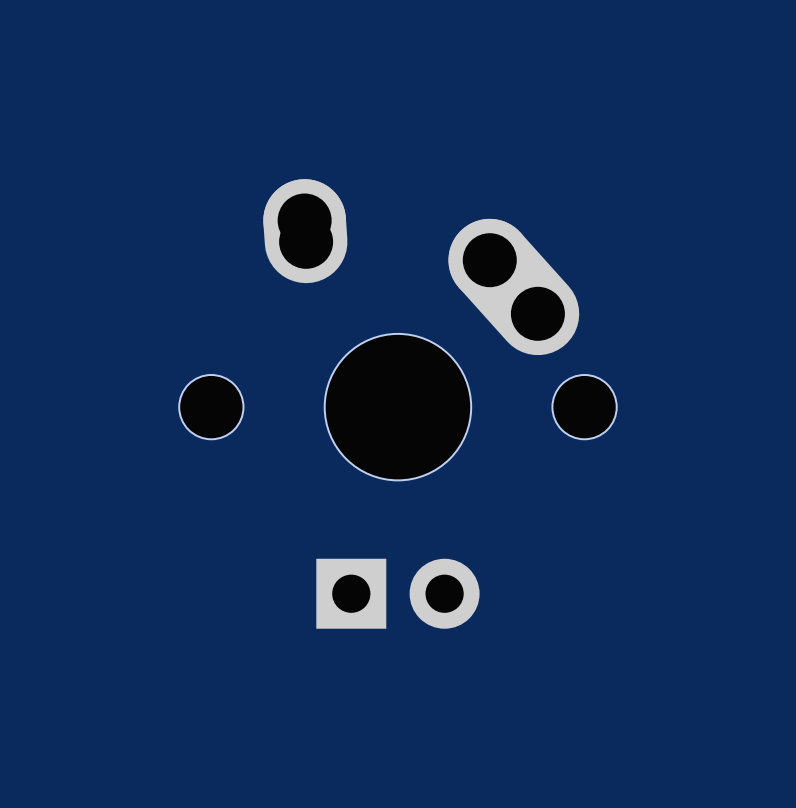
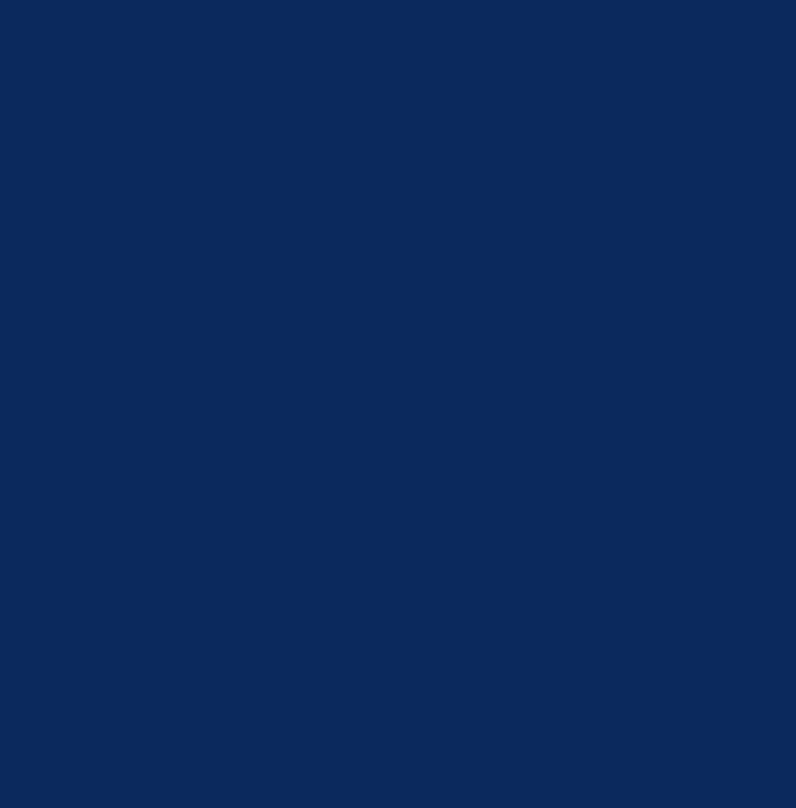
part: (397, 403) -> none

